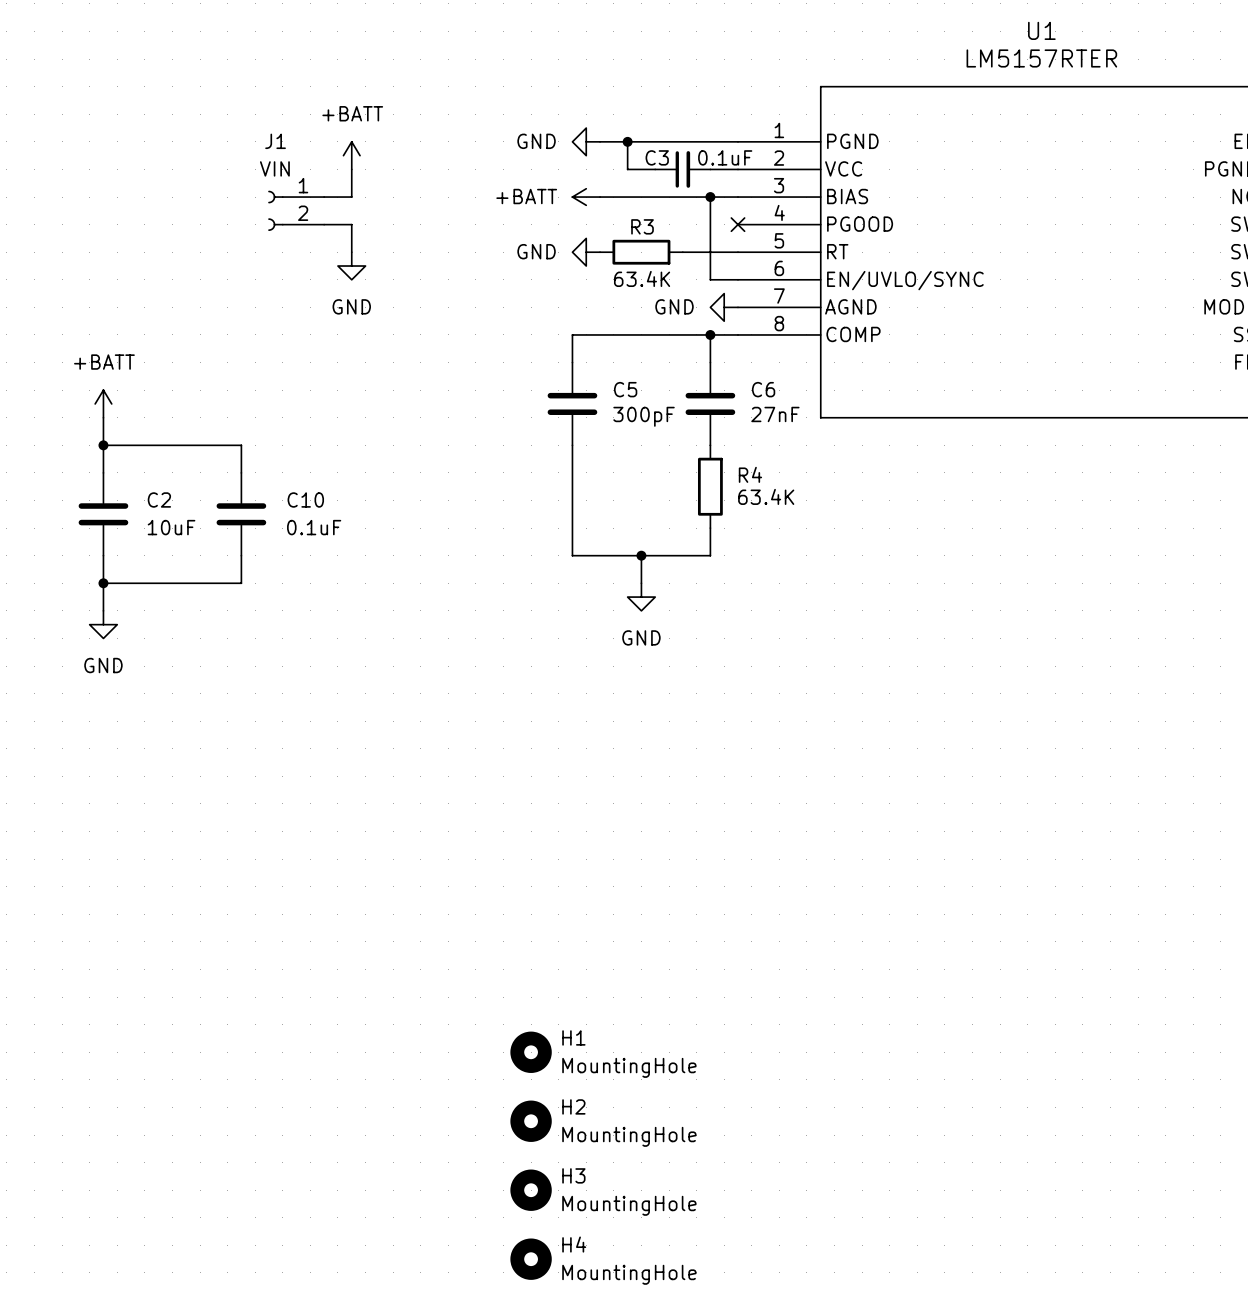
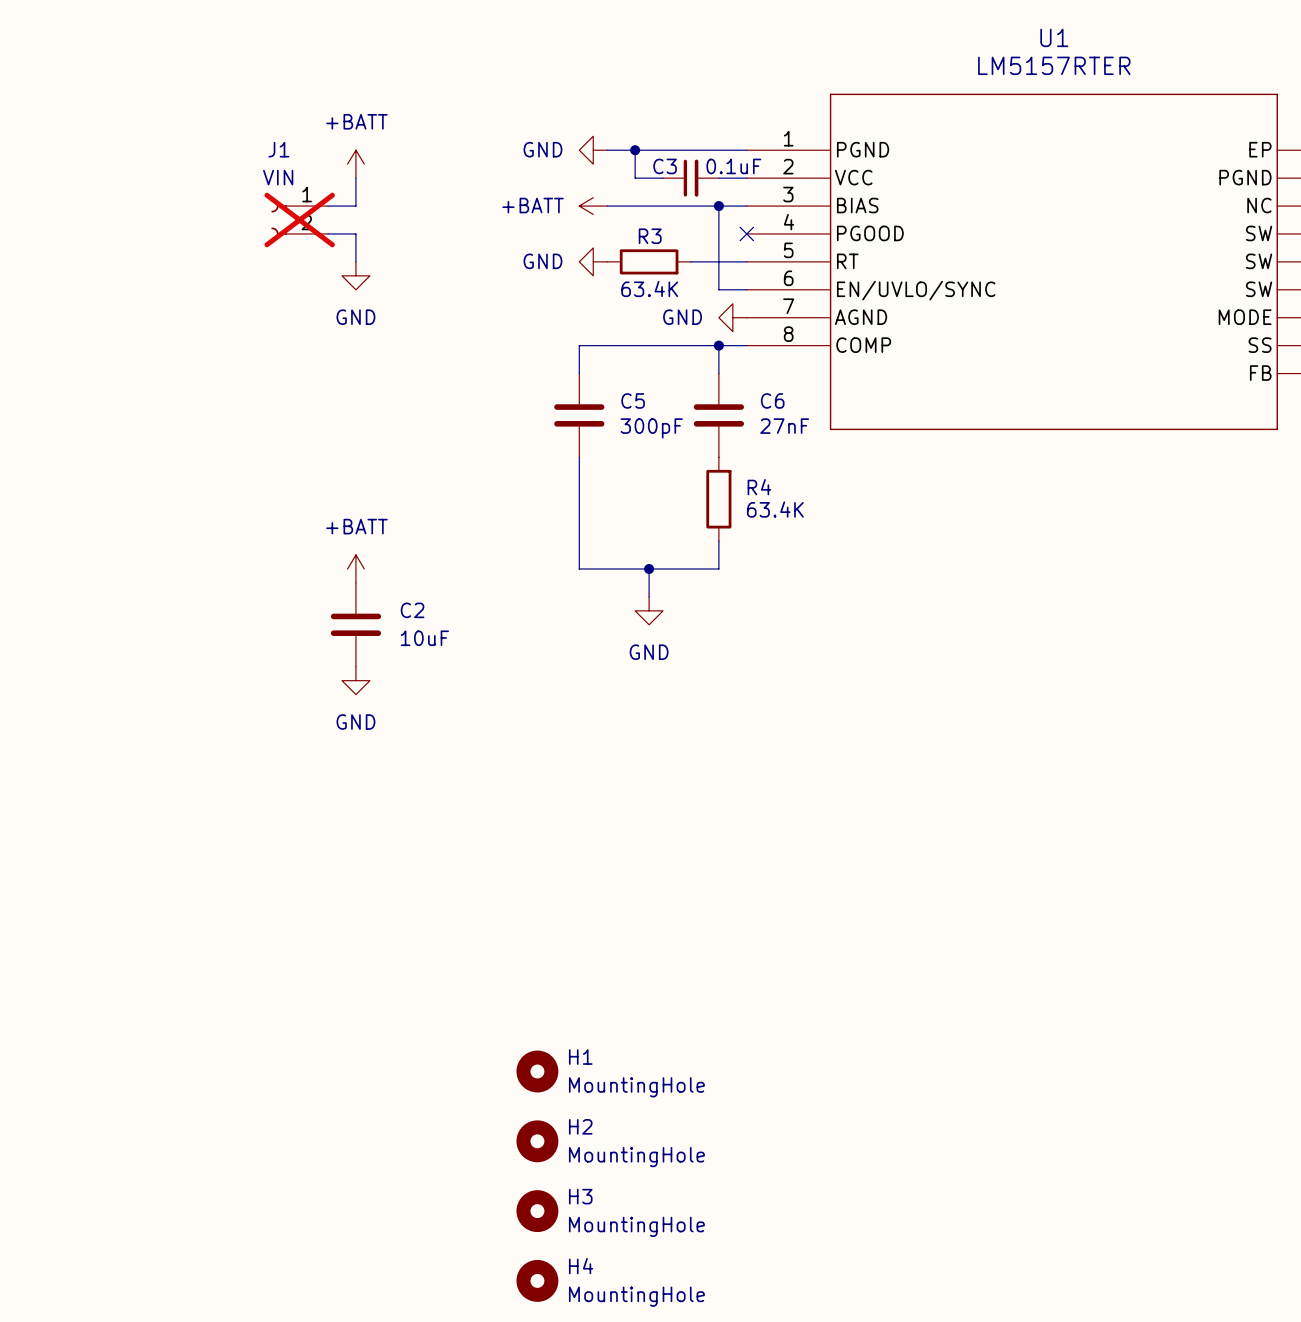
J1 do-not-place cross: none -> (299, 220)
power symbol: +BATT (103, 403) -> none
wire: (103, 417) (103, 472) -> none
wire: (103, 445) (241, 445) (241, 472) -> none
junction: (103, 445) -> none
C2 position: (103, 514) -> (355, 624)
C10: 0.1uF (241, 514) -> none
wire: (103, 555) (103, 610) -> none
wire: (241, 555) (241, 583) (103, 583) -> none
power symbol: none -> +BATT (355, 568)
junction: (103, 583) -> none
power symbol position: GND (103, 624) -> GND (355, 680)

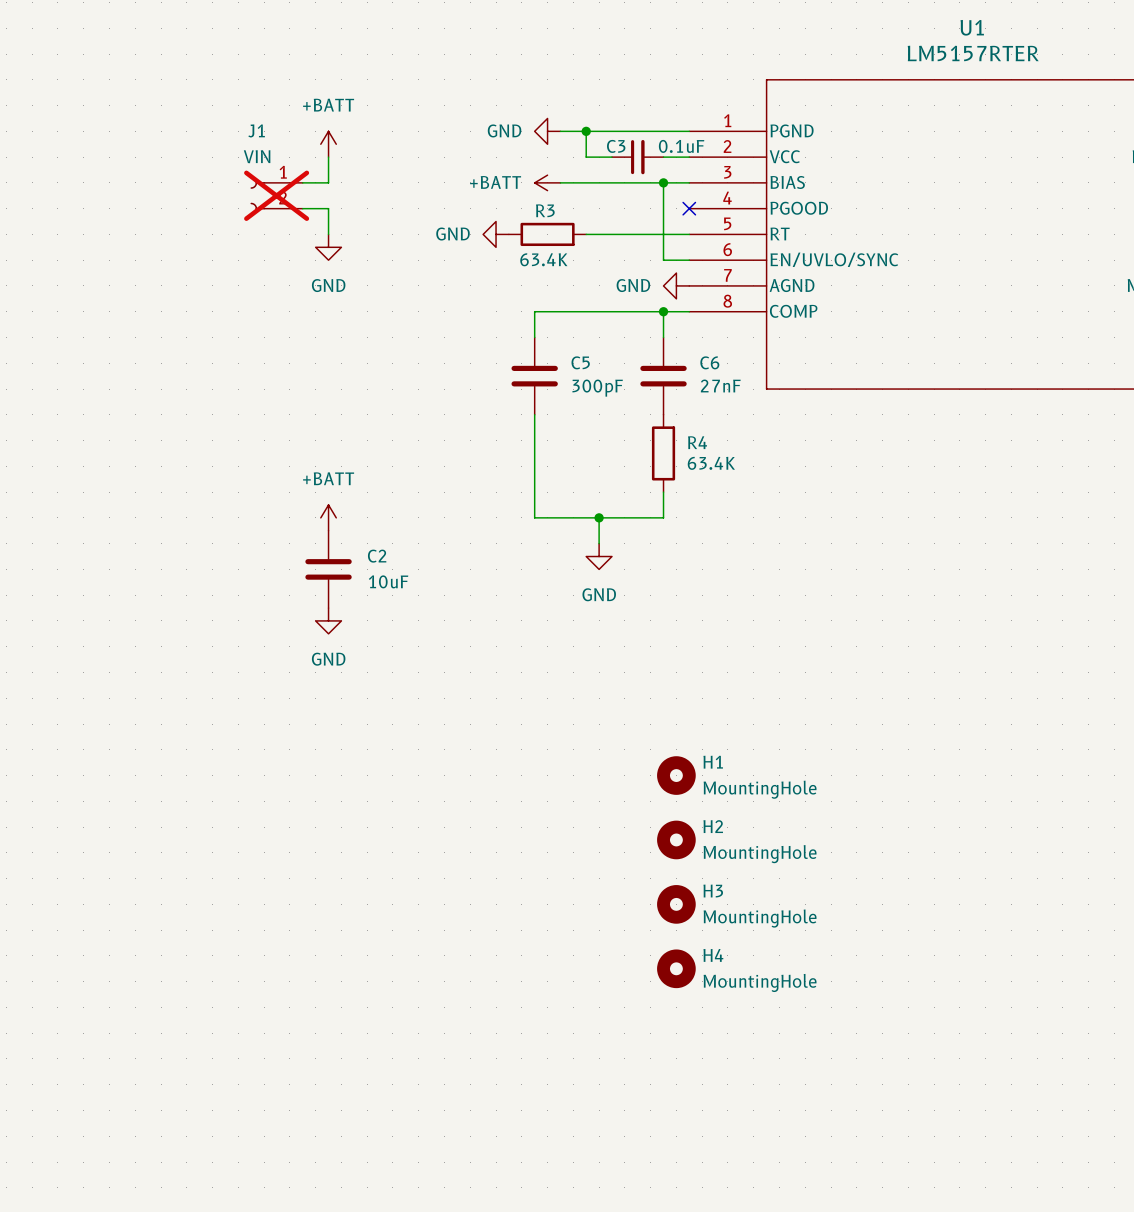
power symbol position: GND (593, 261) -> GND (496, 234)
wire: none -> (586, 234) (637, 234)
R3 position: (649, 261) -> (547, 234)
H1 position: (537, 1071) -> (676, 775)
H2 position: (537, 1141) -> (676, 839)
H3 position: (537, 1211) -> (676, 904)
H4 position: (537, 1280) -> (676, 968)

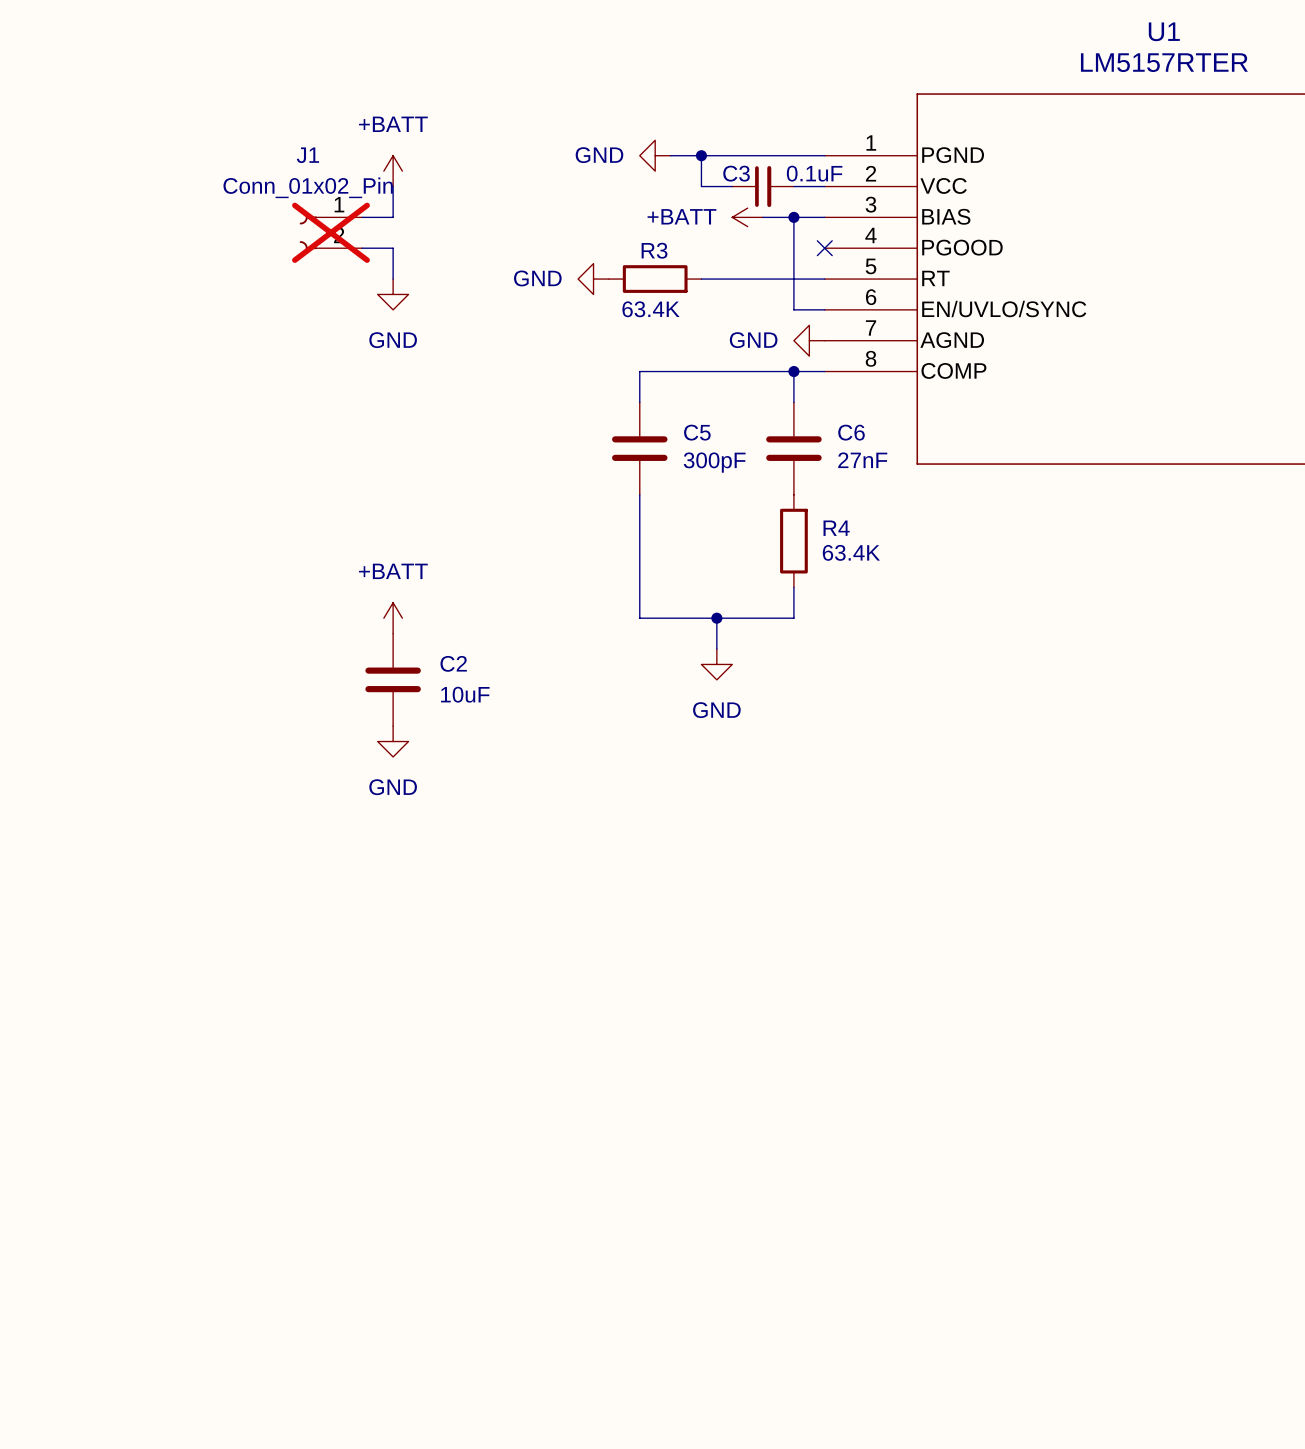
J1 value: VIN (257, 156) -> Conn_01x02_Pin (308, 187)
power symbol position: +BATT (547, 182) -> +BATT (747, 217)
wire: (560, 182) (637, 182) -> none
H1: MountingHole (676, 775) -> none
H2: MountingHole (676, 839) -> none
H3: MountingHole (676, 904) -> none
H4: MountingHole (676, 968) -> none

